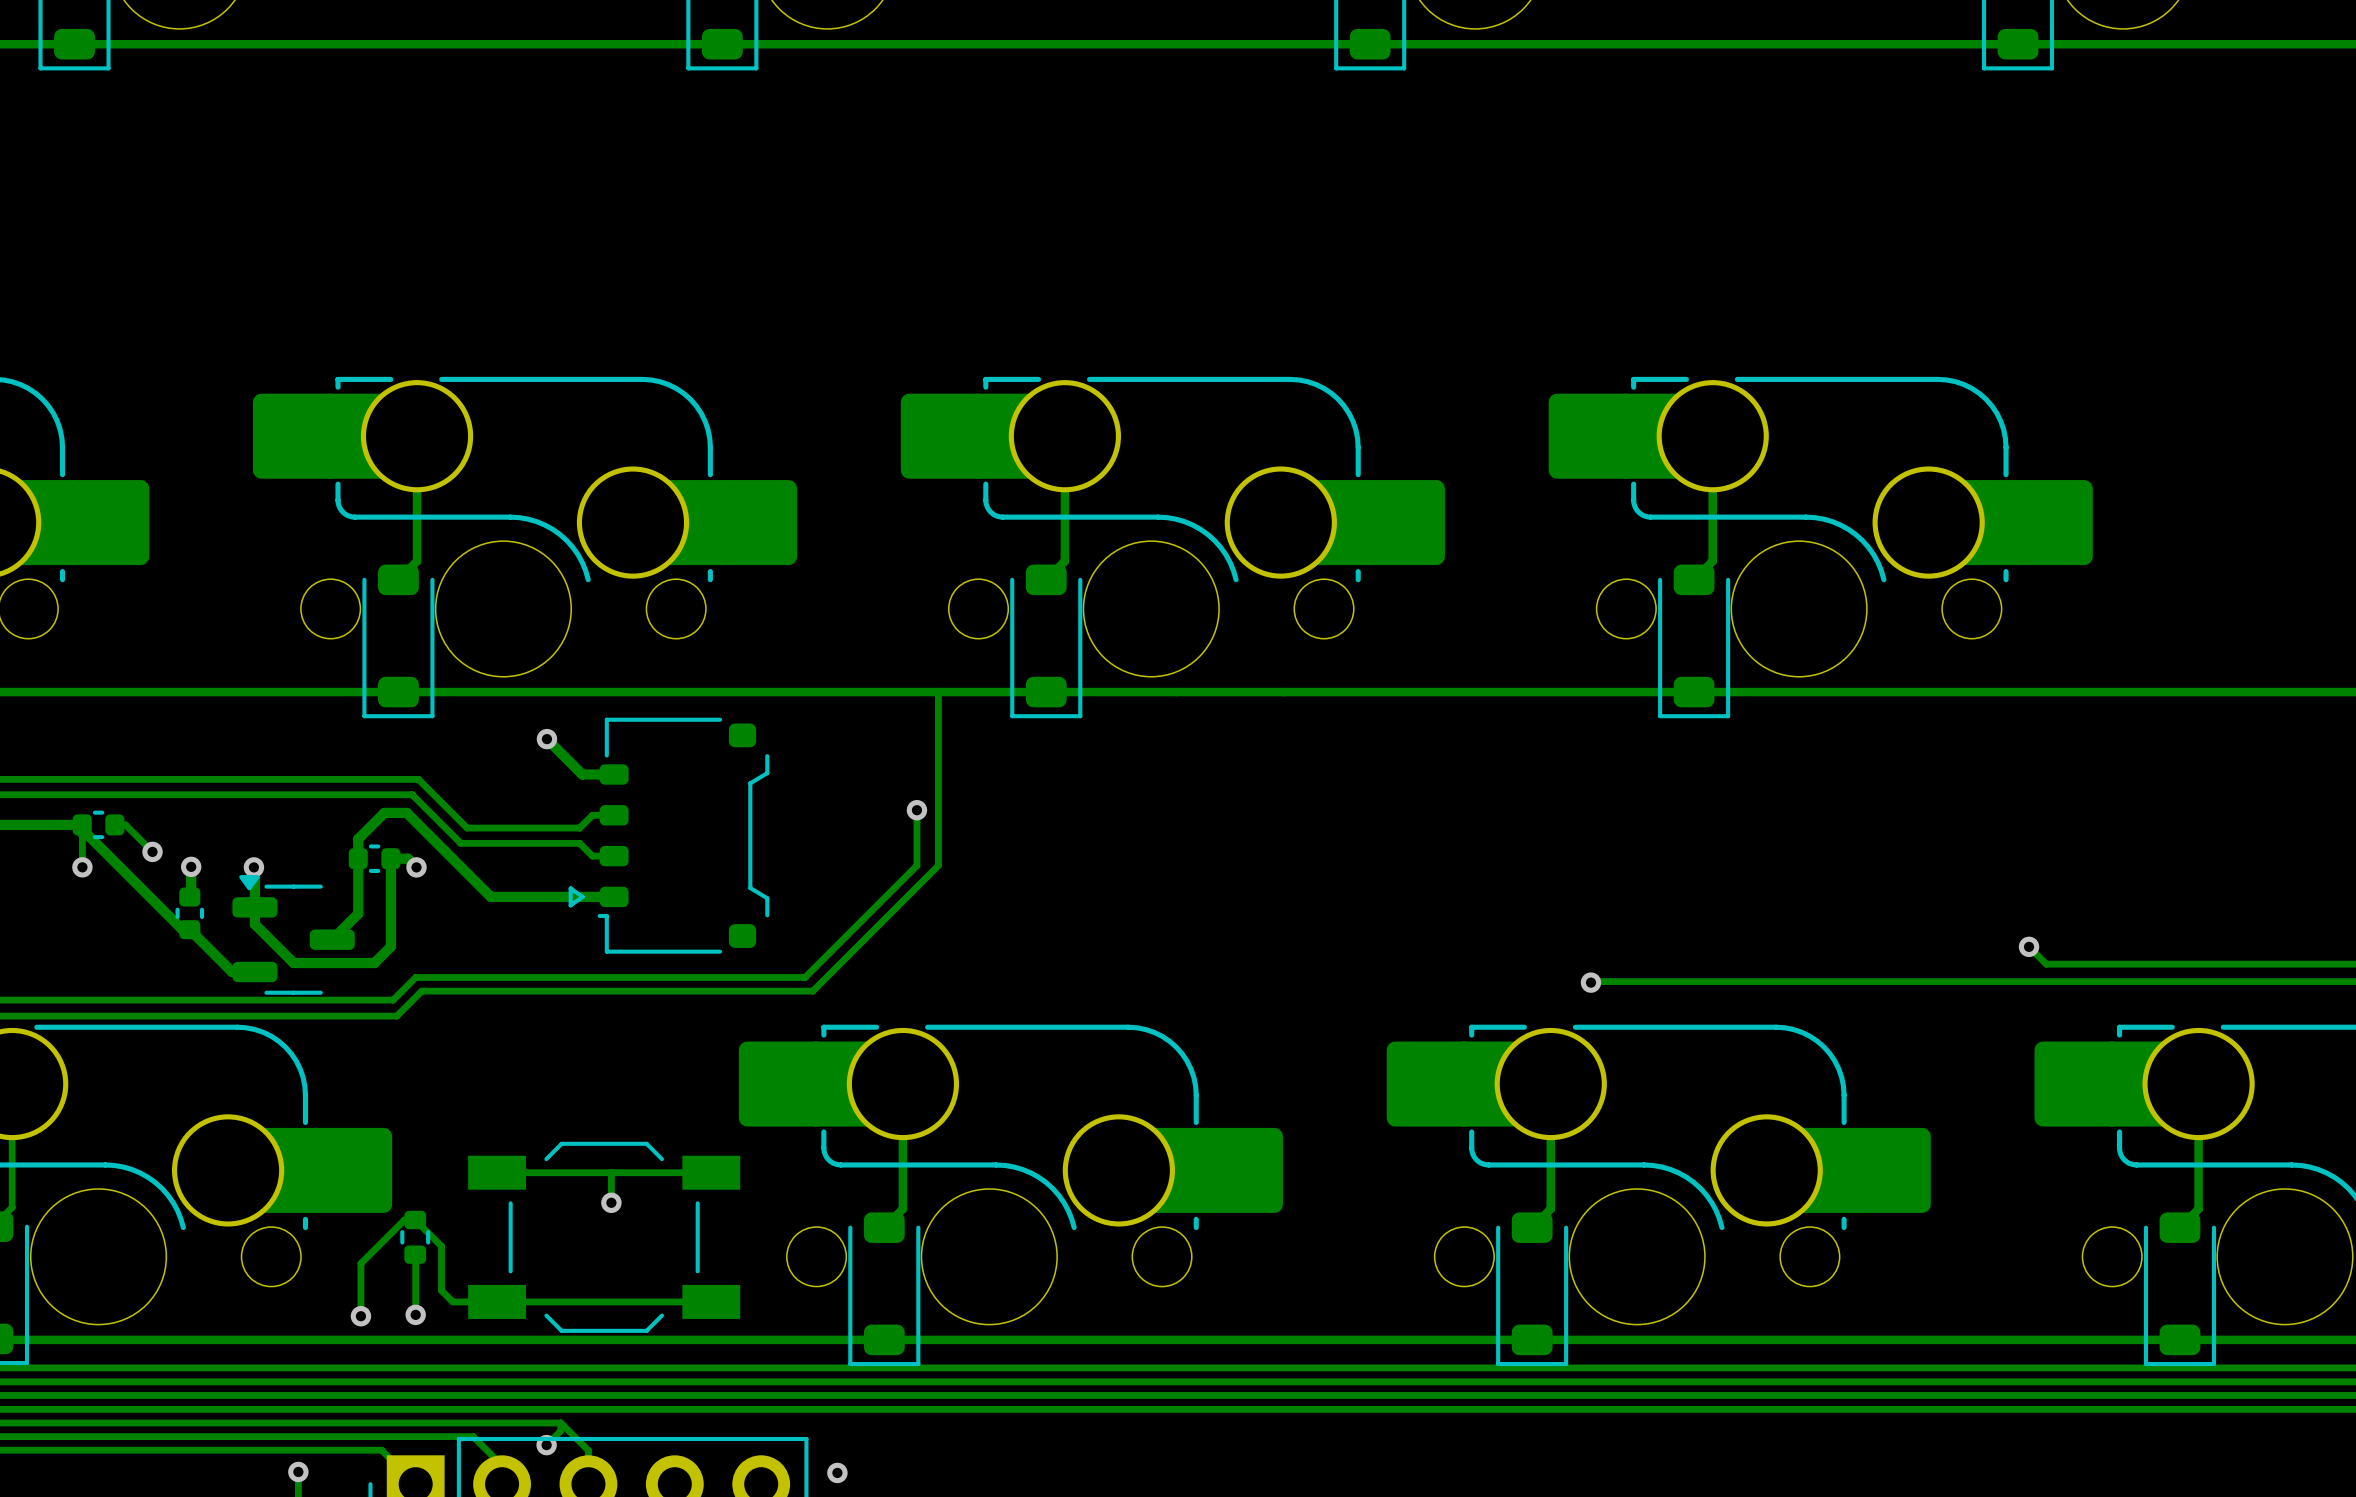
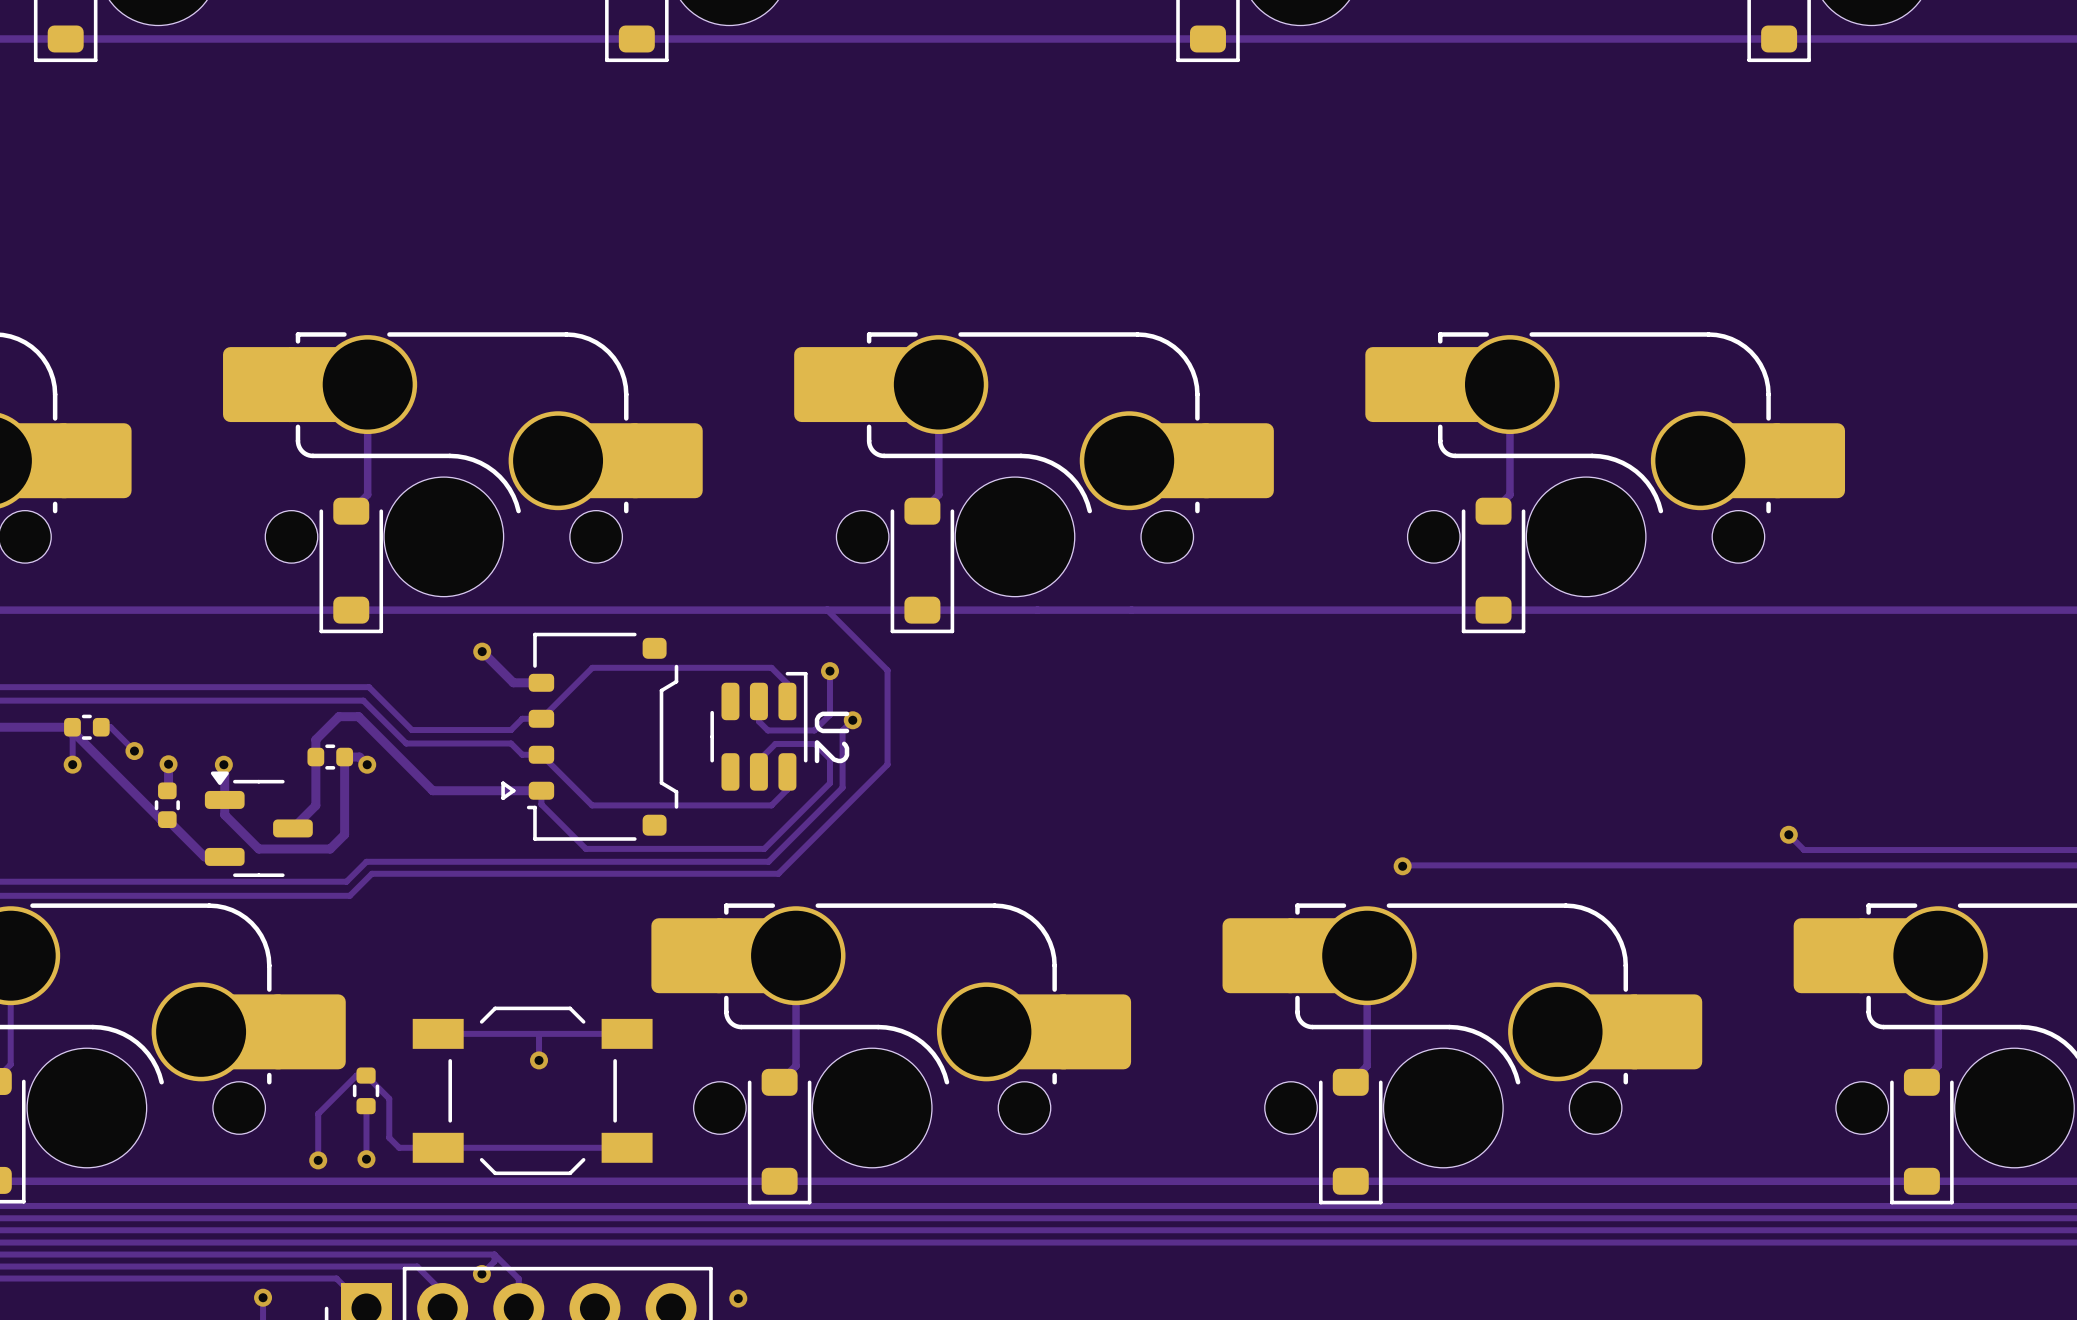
track: (938, 692) (938, 865) (812, 991) -> (827, 610) (887, 670) (887, 764) (778, 873) (716, 873)
track: none -> (829, 671) (829, 714) (814, 730) (767, 730) (758, 721) (758, 701)
via: none -> (829, 671)
track: none -> (787, 701) (787, 683) (771, 667) (592, 667) (541, 718)
track: (916, 810) (916, 865) (805, 977) -> (852, 720) (842, 730) (842, 787) (768, 861) (709, 861)
via: (916, 810) -> none
via: none -> (852, 720)
U2: none -> (758, 731)
track: none -> (541, 754) (592, 805) (771, 805) (787, 789) (787, 771)
track: none -> (758, 771) (758, 760) (775, 743) (815, 743) (829, 758) (829, 783) (764, 848) (585, 848) (541, 804) (541, 790)

